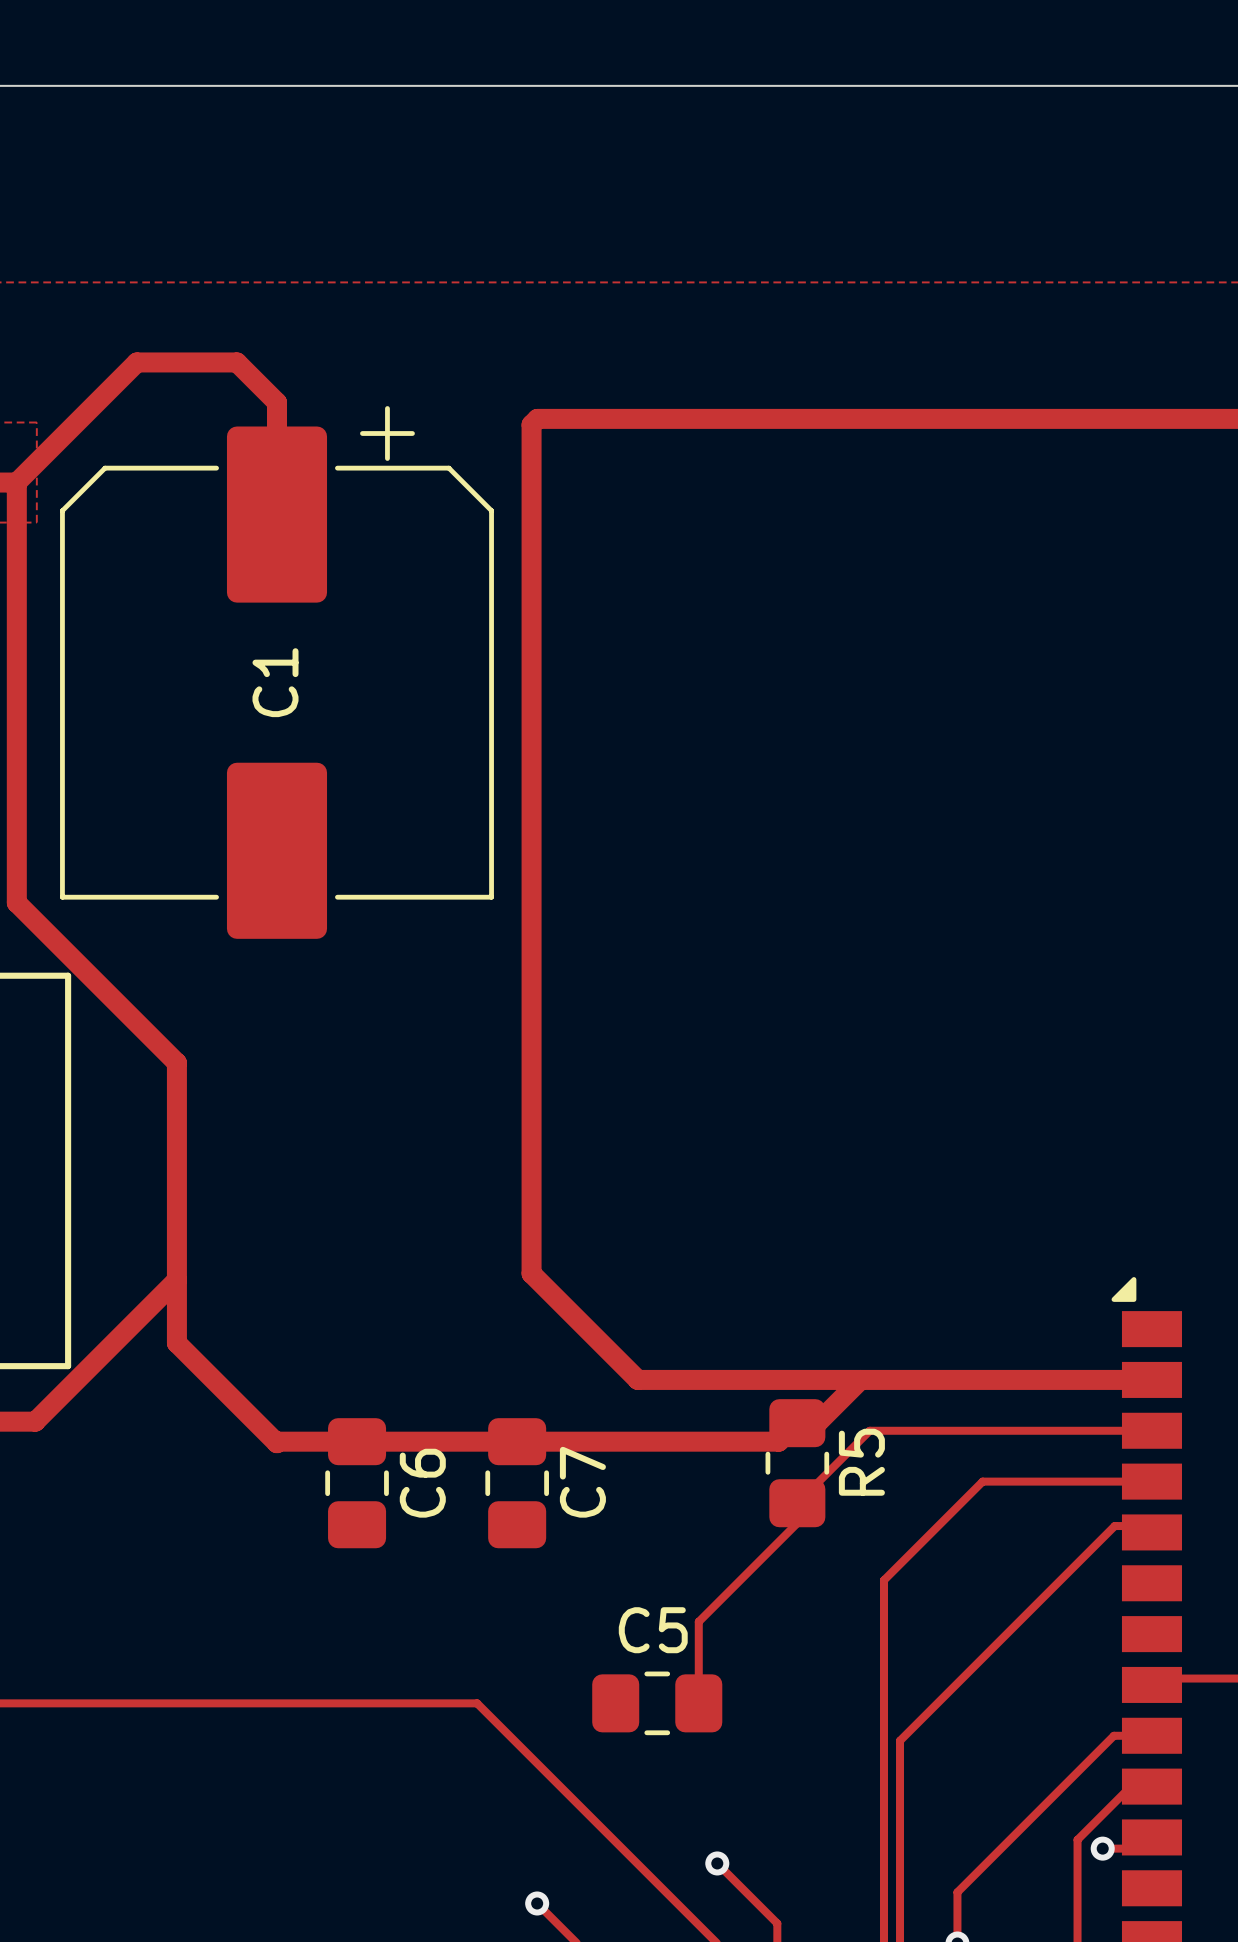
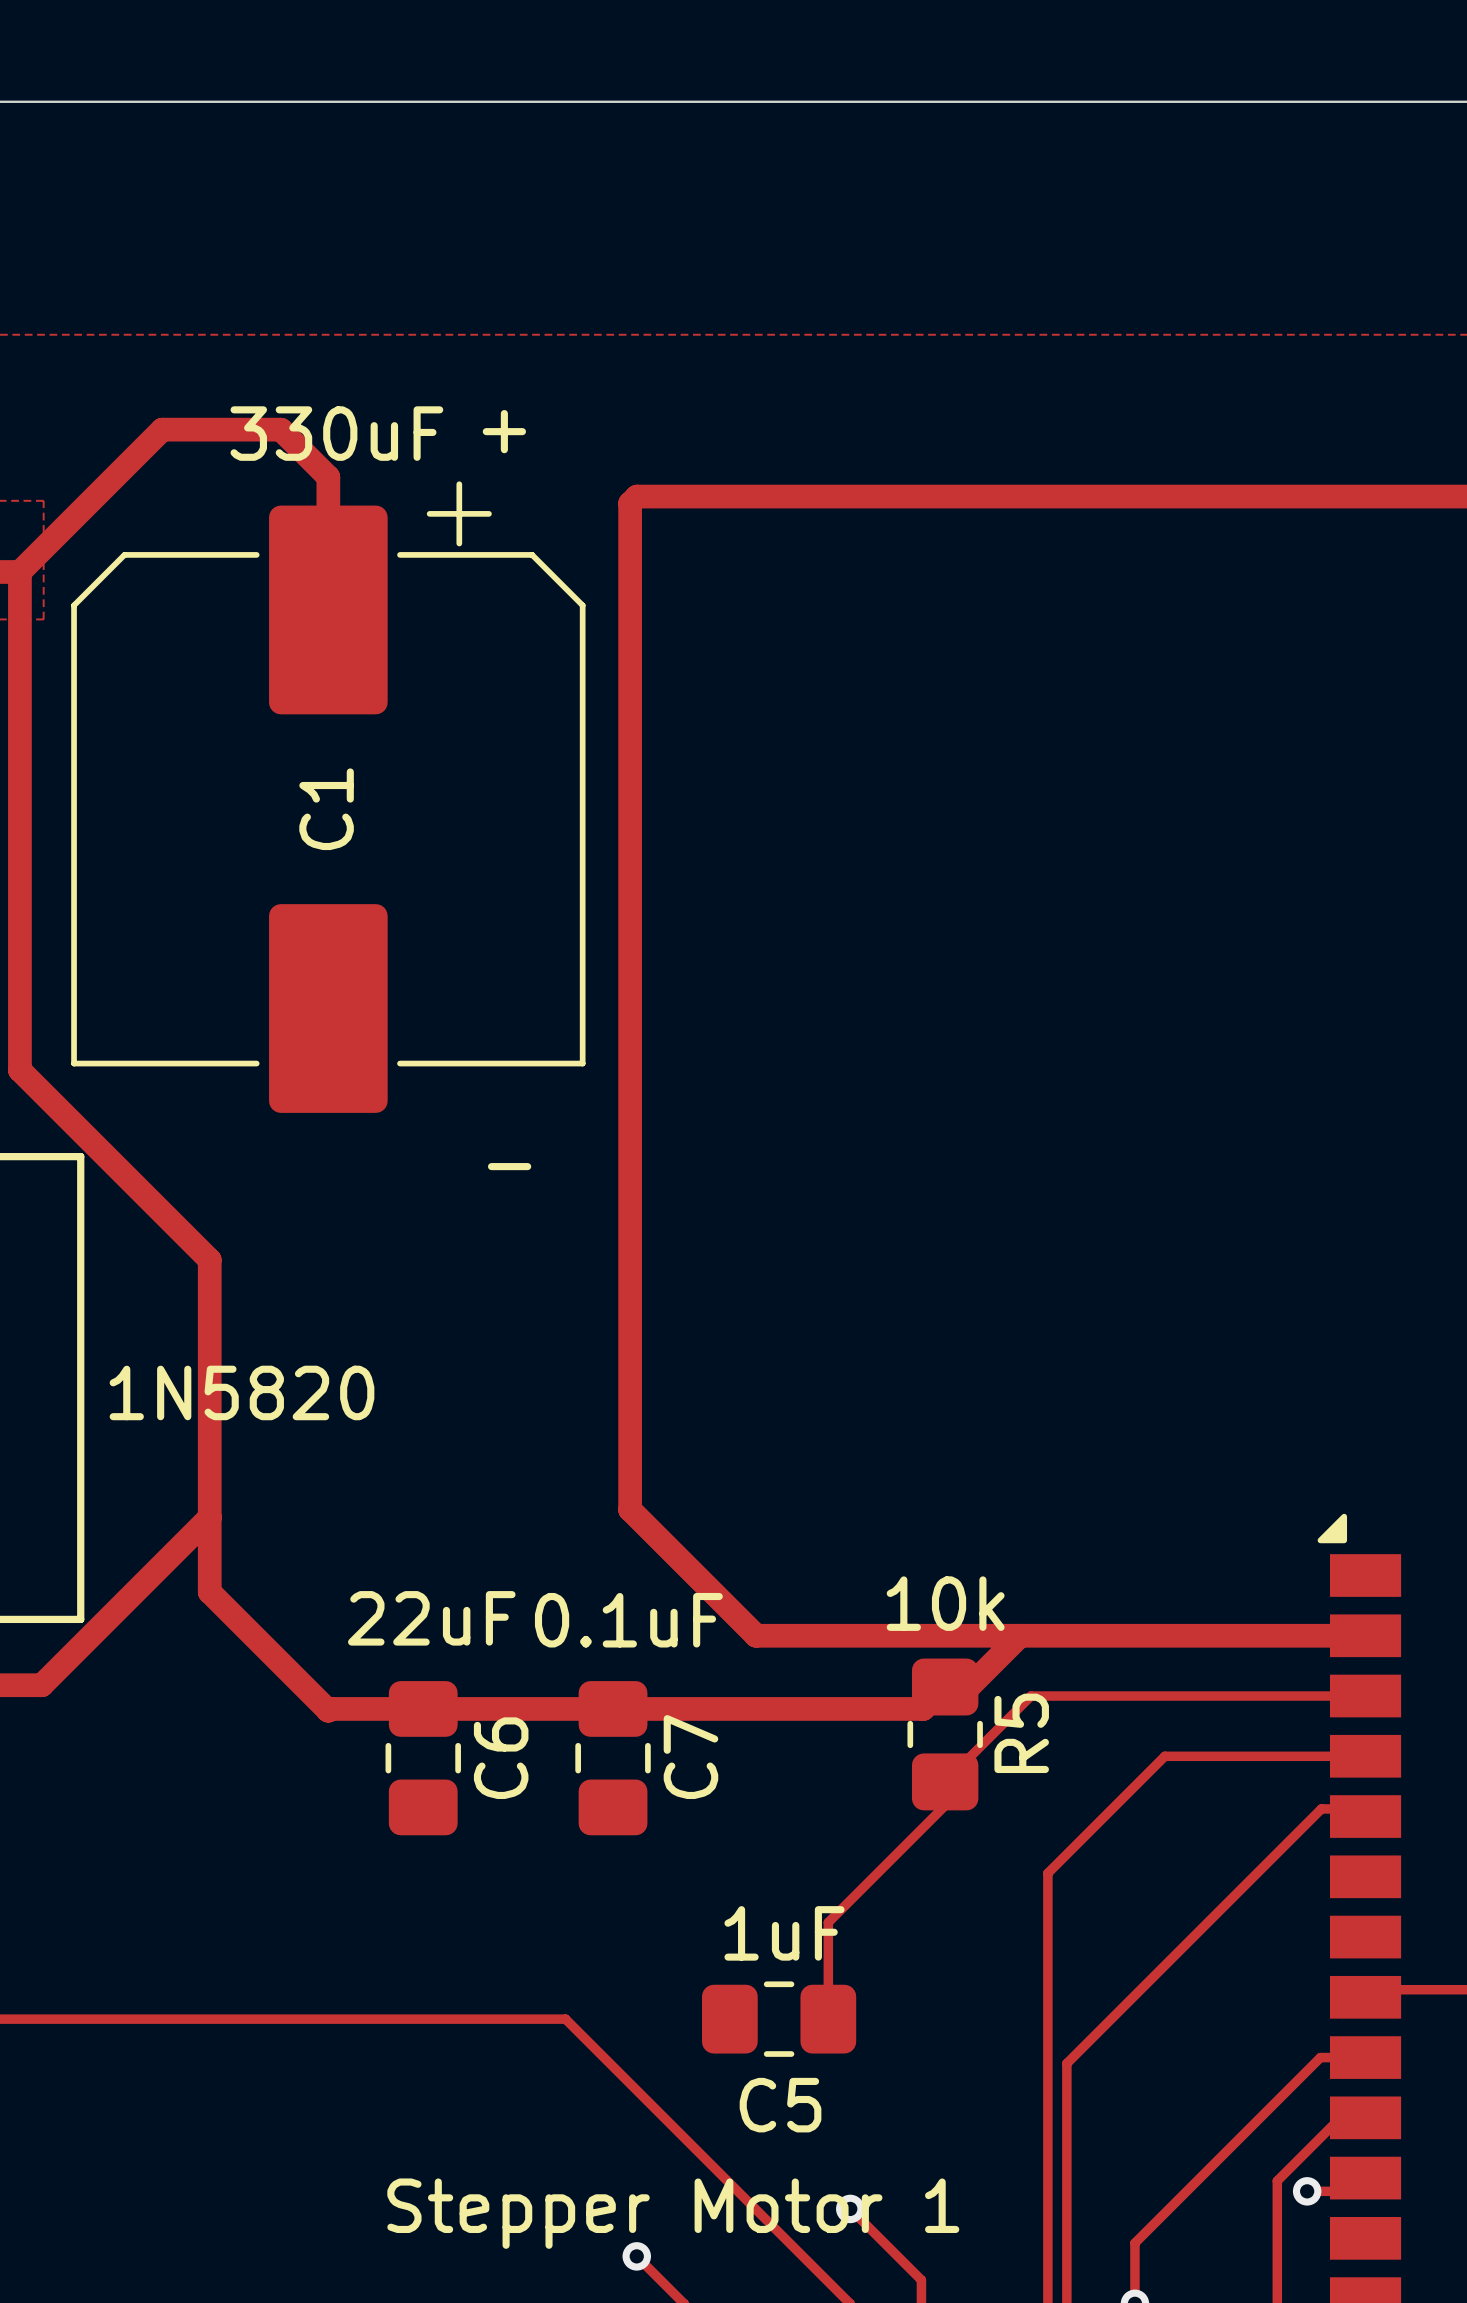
C1 text: none -> + (504, 431)
C1 text: none -> 330uF (336, 433)
C1 text: none -> - (509, 1166)
part text: none -> 1N5820 (241, 1392)
R5 text: none -> 10k (945, 1603)
C6 text: none -> 22uF (431, 1618)
C7 text: none -> 0.1uF (628, 1620)
C5 name position: C5 (653, 1630) -> C5 (780, 2105)
C5 text: none -> 1uF (784, 1933)
part text: none -> Stepper Motor 1 (673, 2213)

